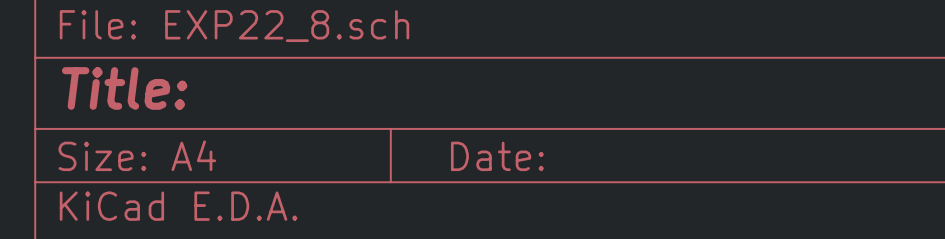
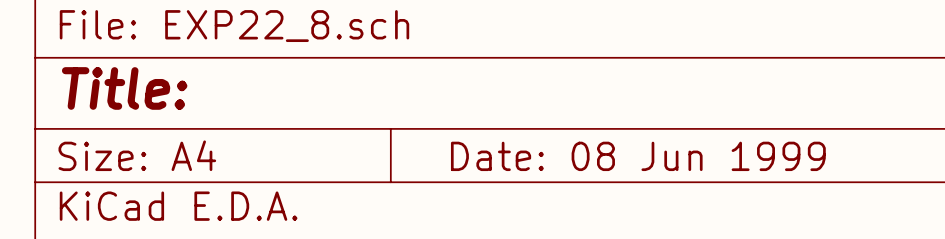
title block: Date: (497, 156) -> Date: 08 Jun 1999 (638, 156)

